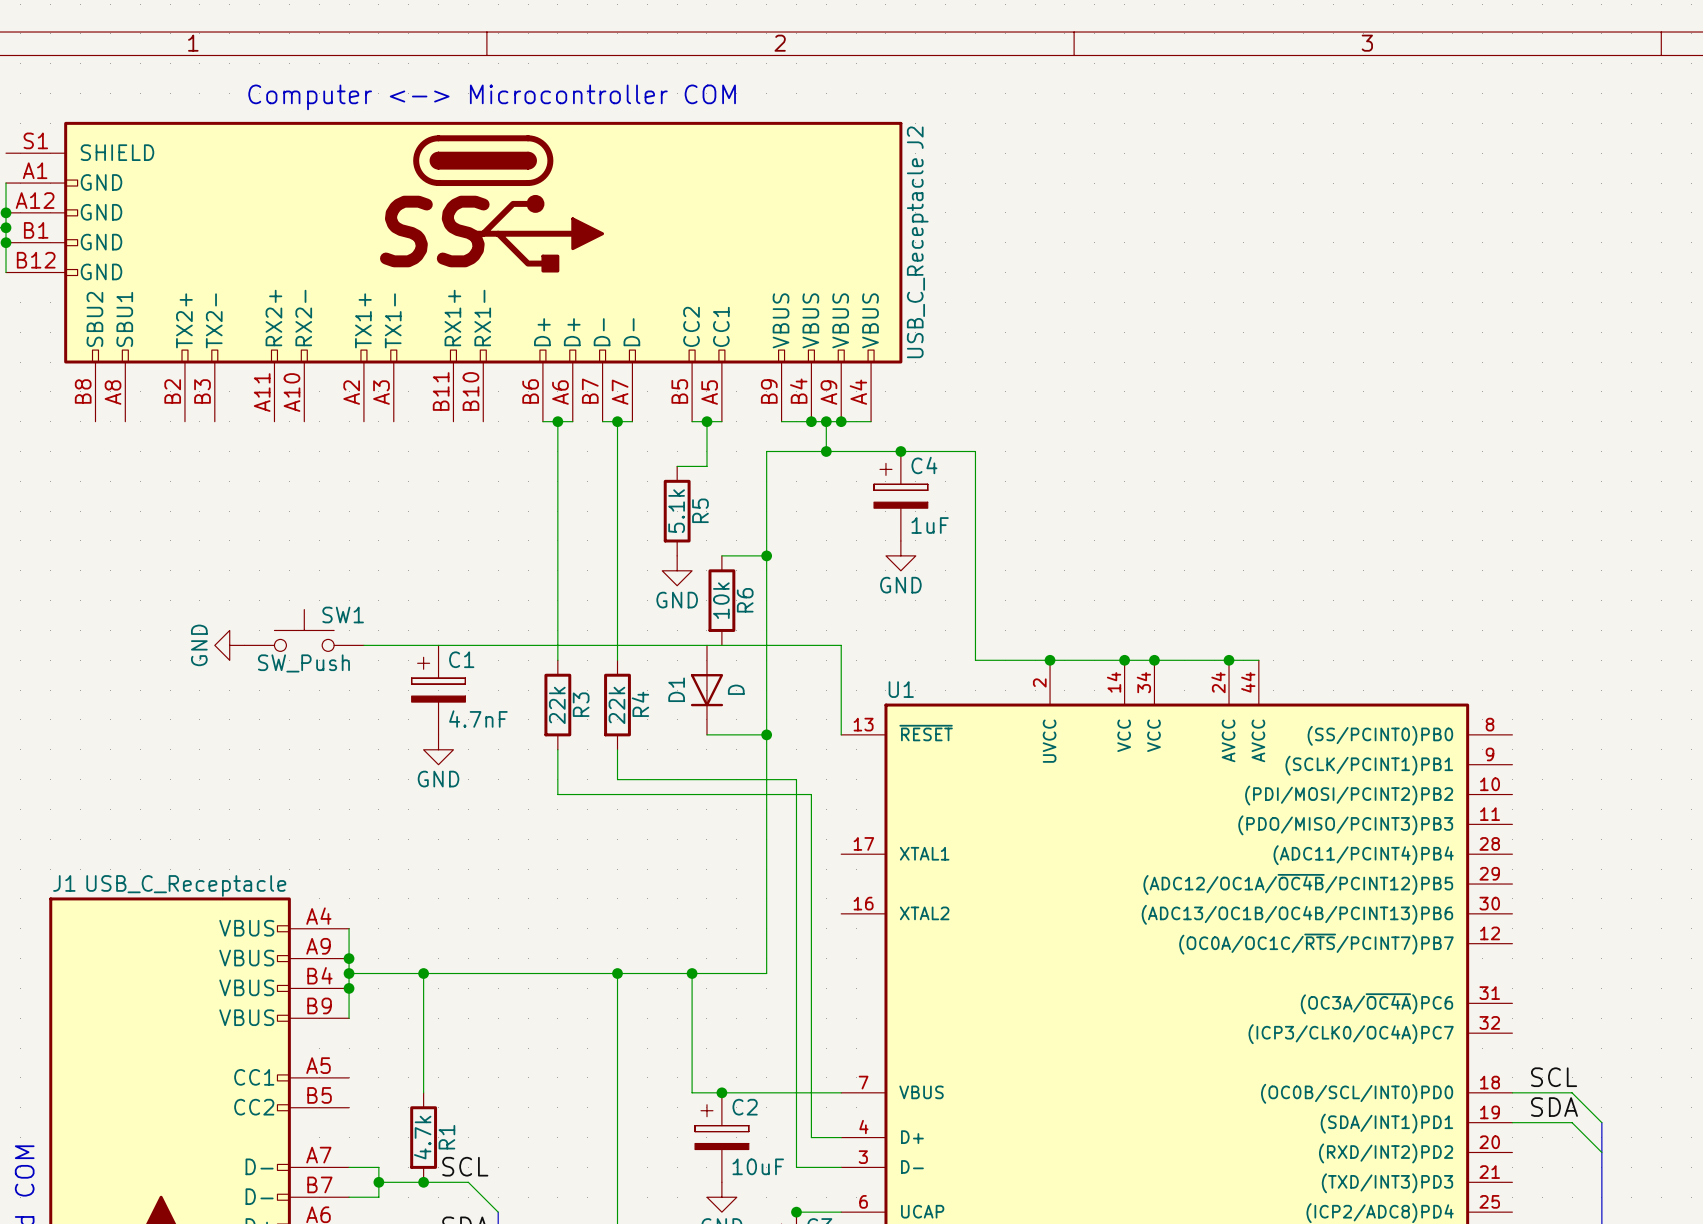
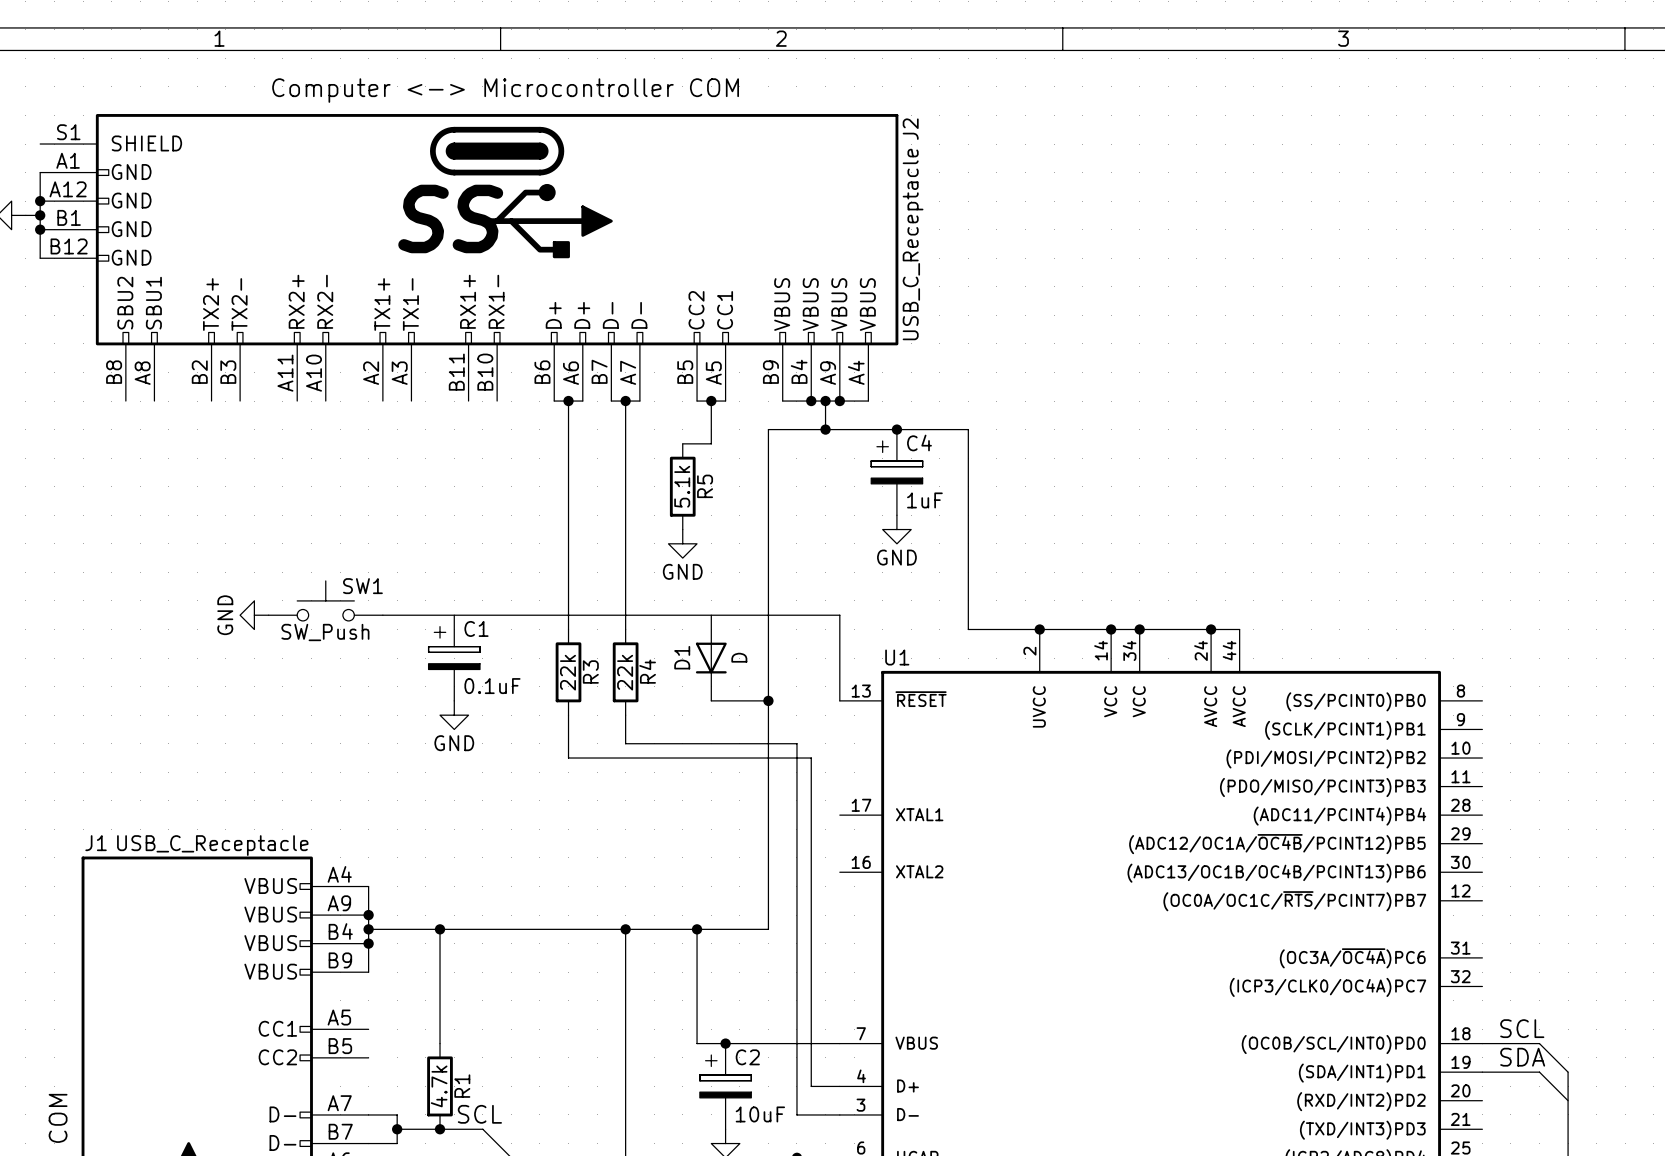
wire: (721, 555) (766, 555) -> none
junction: (766, 555) -> none
R6: 10k (721, 600) -> none
C1 value: 4.7nF (478, 719) -> 0.1uF (492, 686)

